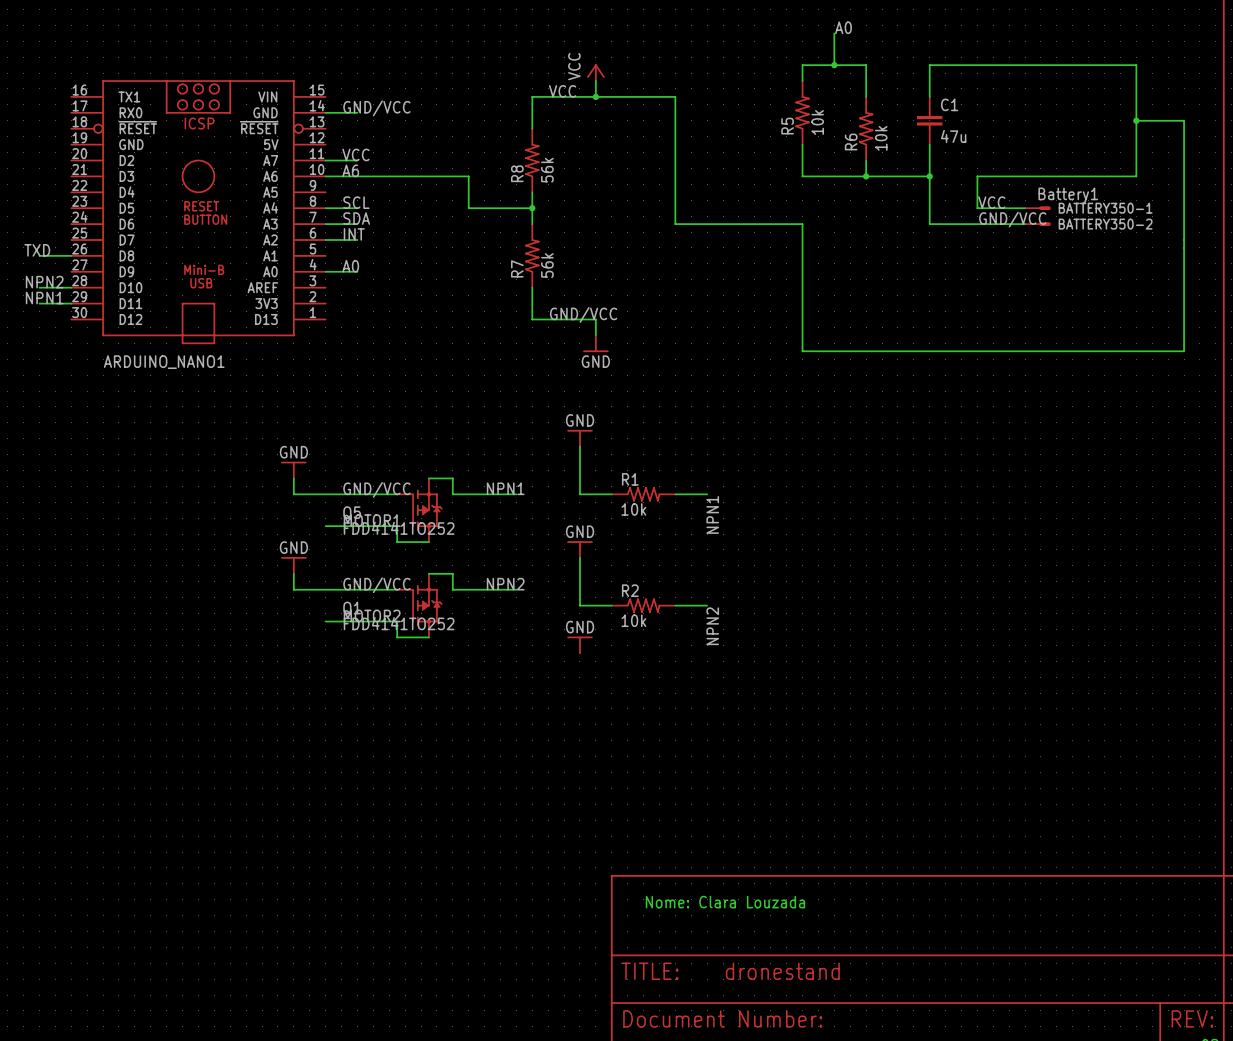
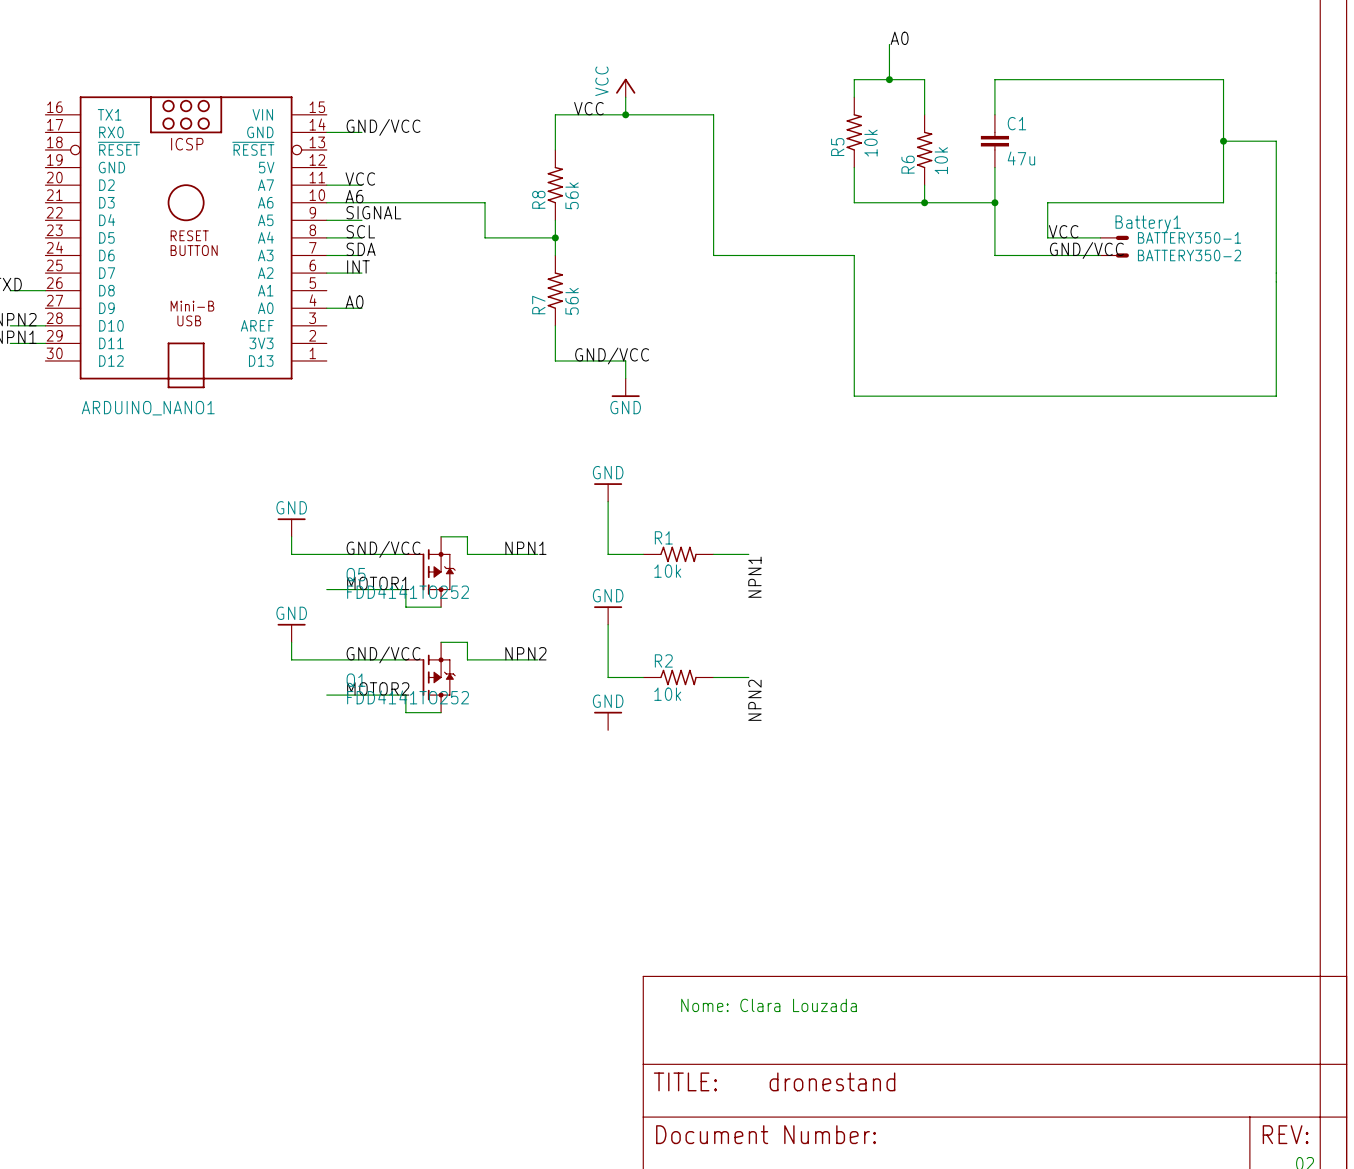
label: none -> SIGNAL (373, 212)
wire: none -> (326, 220) (361, 220)

